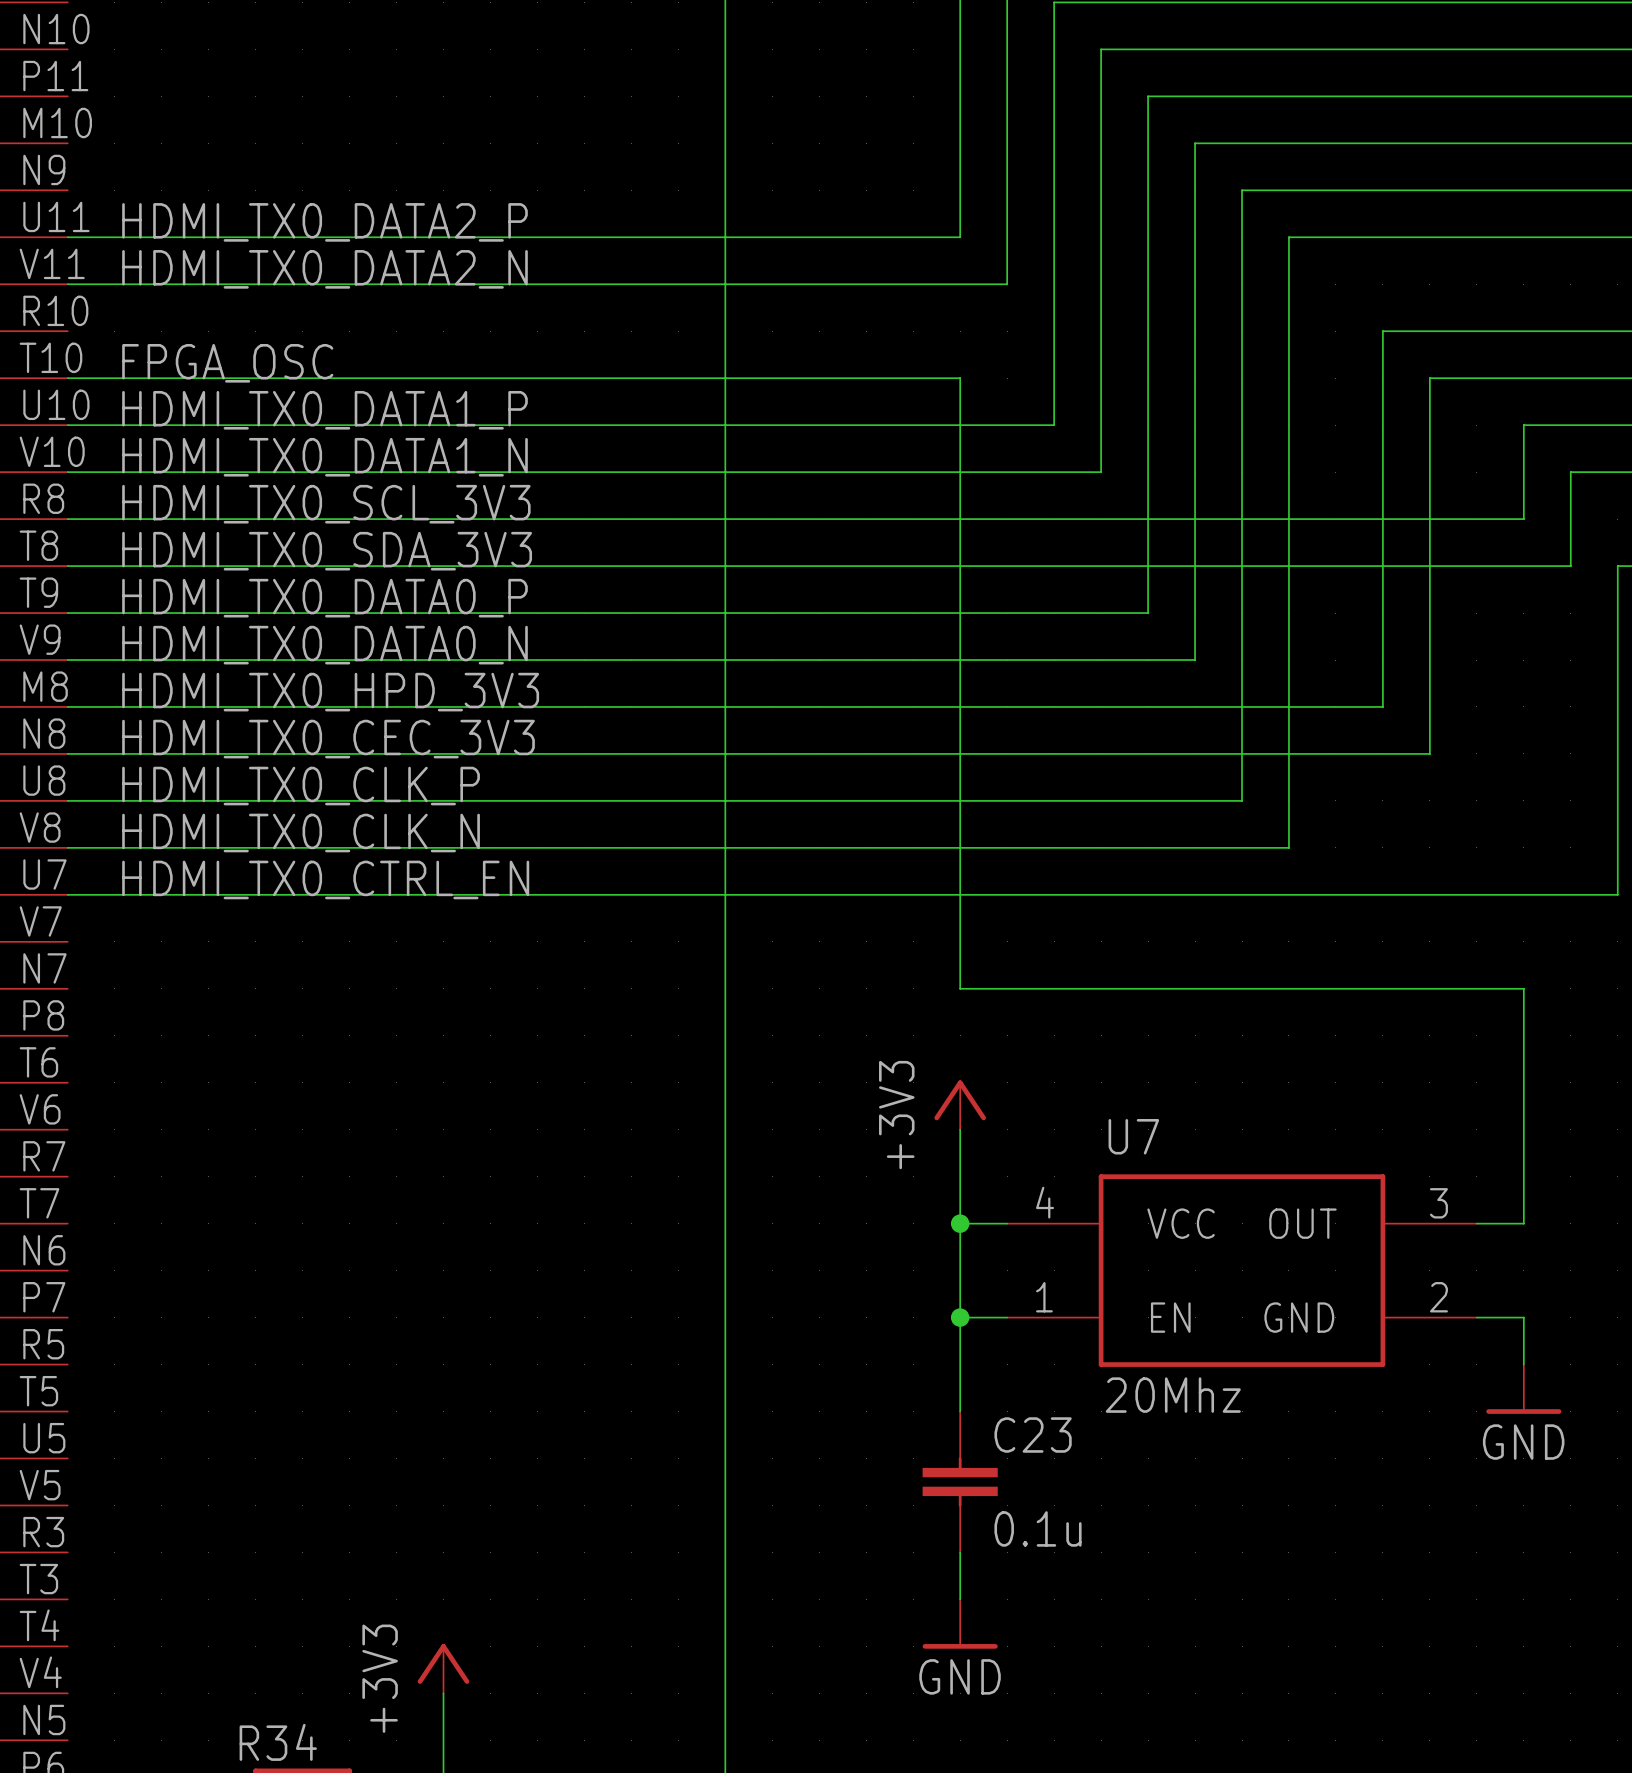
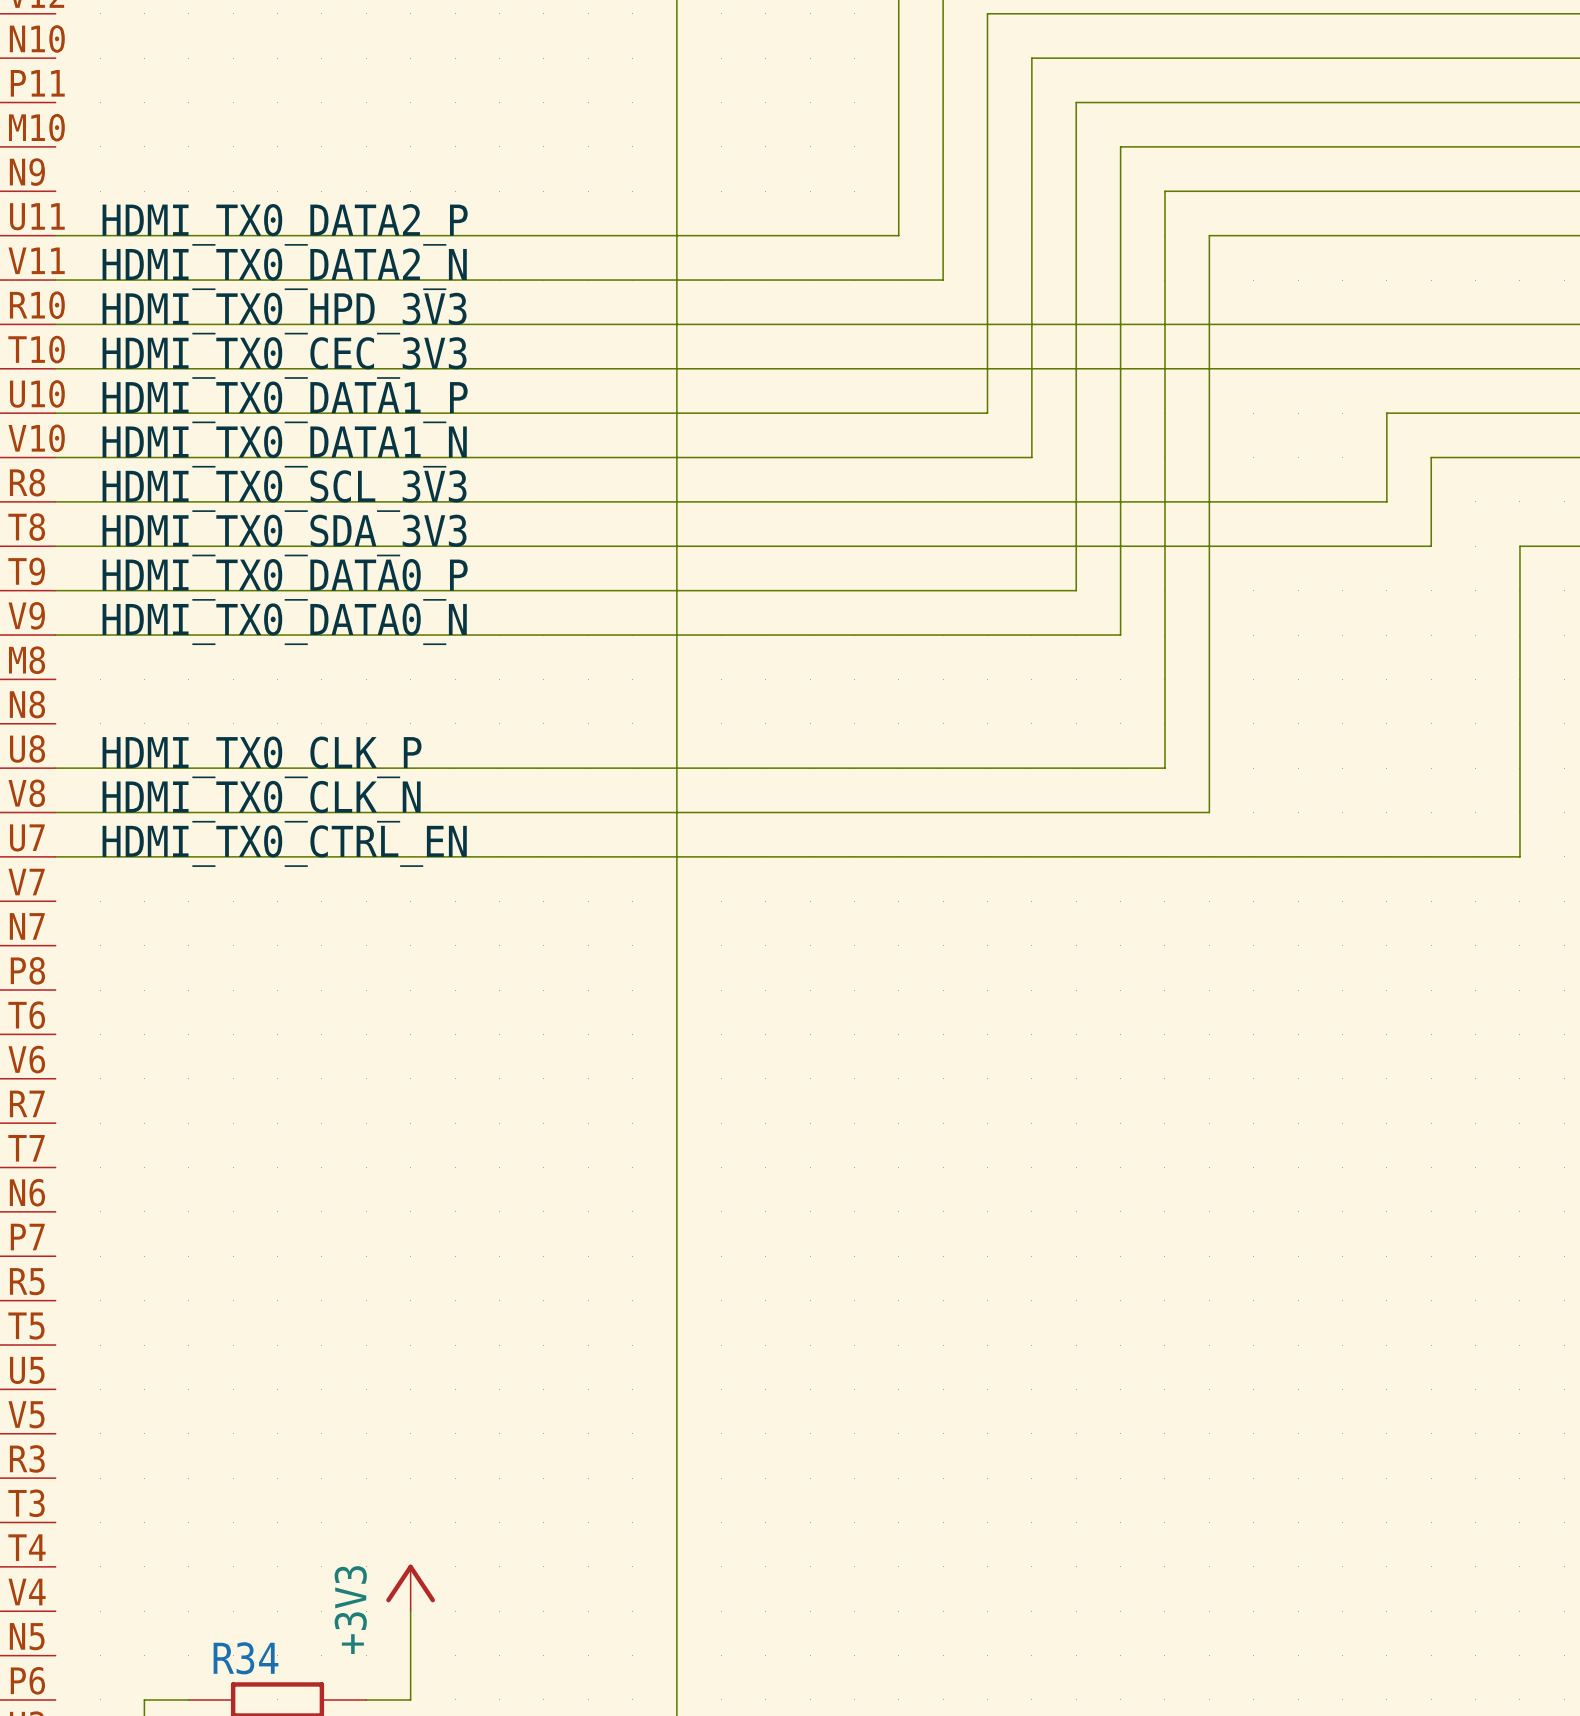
wire: (1382, 331) (1382, 706) (67, 706) -> (1298, 324) (55, 324)
label: FPGA_OSC (227, 363) -> HDMI_TX0_CEC_3V3 (284, 357)
wire: (960, 378) (960, 988) (1523, 988) (1523, 1223) (1476, 1223) -> (898, 368) (1342, 368)
wire: (1429, 378) (1429, 753) (67, 753) -> none
wire: (1523, 425) (1523, 472) -> (1431, 413) (1386, 413) (1386, 501)
wire: (1570, 472) (1570, 566) (1523, 566) -> (1475, 457) (1431, 457)
wire: (1476, 519) (1523, 519) -> (1431, 546) (1431, 501)
label position: HDMI_TX0_HPD_3V3 (330, 692) -> HDMI_TX0_HPD_3V3 (284, 313)
label: HDMI_TX0_CEC_3V3 (328, 739) -> none
power symbol: +3V3 (960, 1105) -> none
wire: (960, 1129) (960, 1411) -> none
wire: (960, 1223) (1007, 1223) -> none
junction: (960, 1223) -> none
U7: 20Mhz (1242, 1270) -> none
wire: (960, 1317) (1007, 1317) -> none
junction: (960, 1317) -> none
wire: (1476, 1317) (1523, 1317) (1523, 1364) -> none
power symbol: GND (1523, 1389) -> none
C23: 0.1u (960, 1481) -> none
wire: (960, 1552) (960, 1599) -> none
power symbol: GND (960, 1624) -> none

